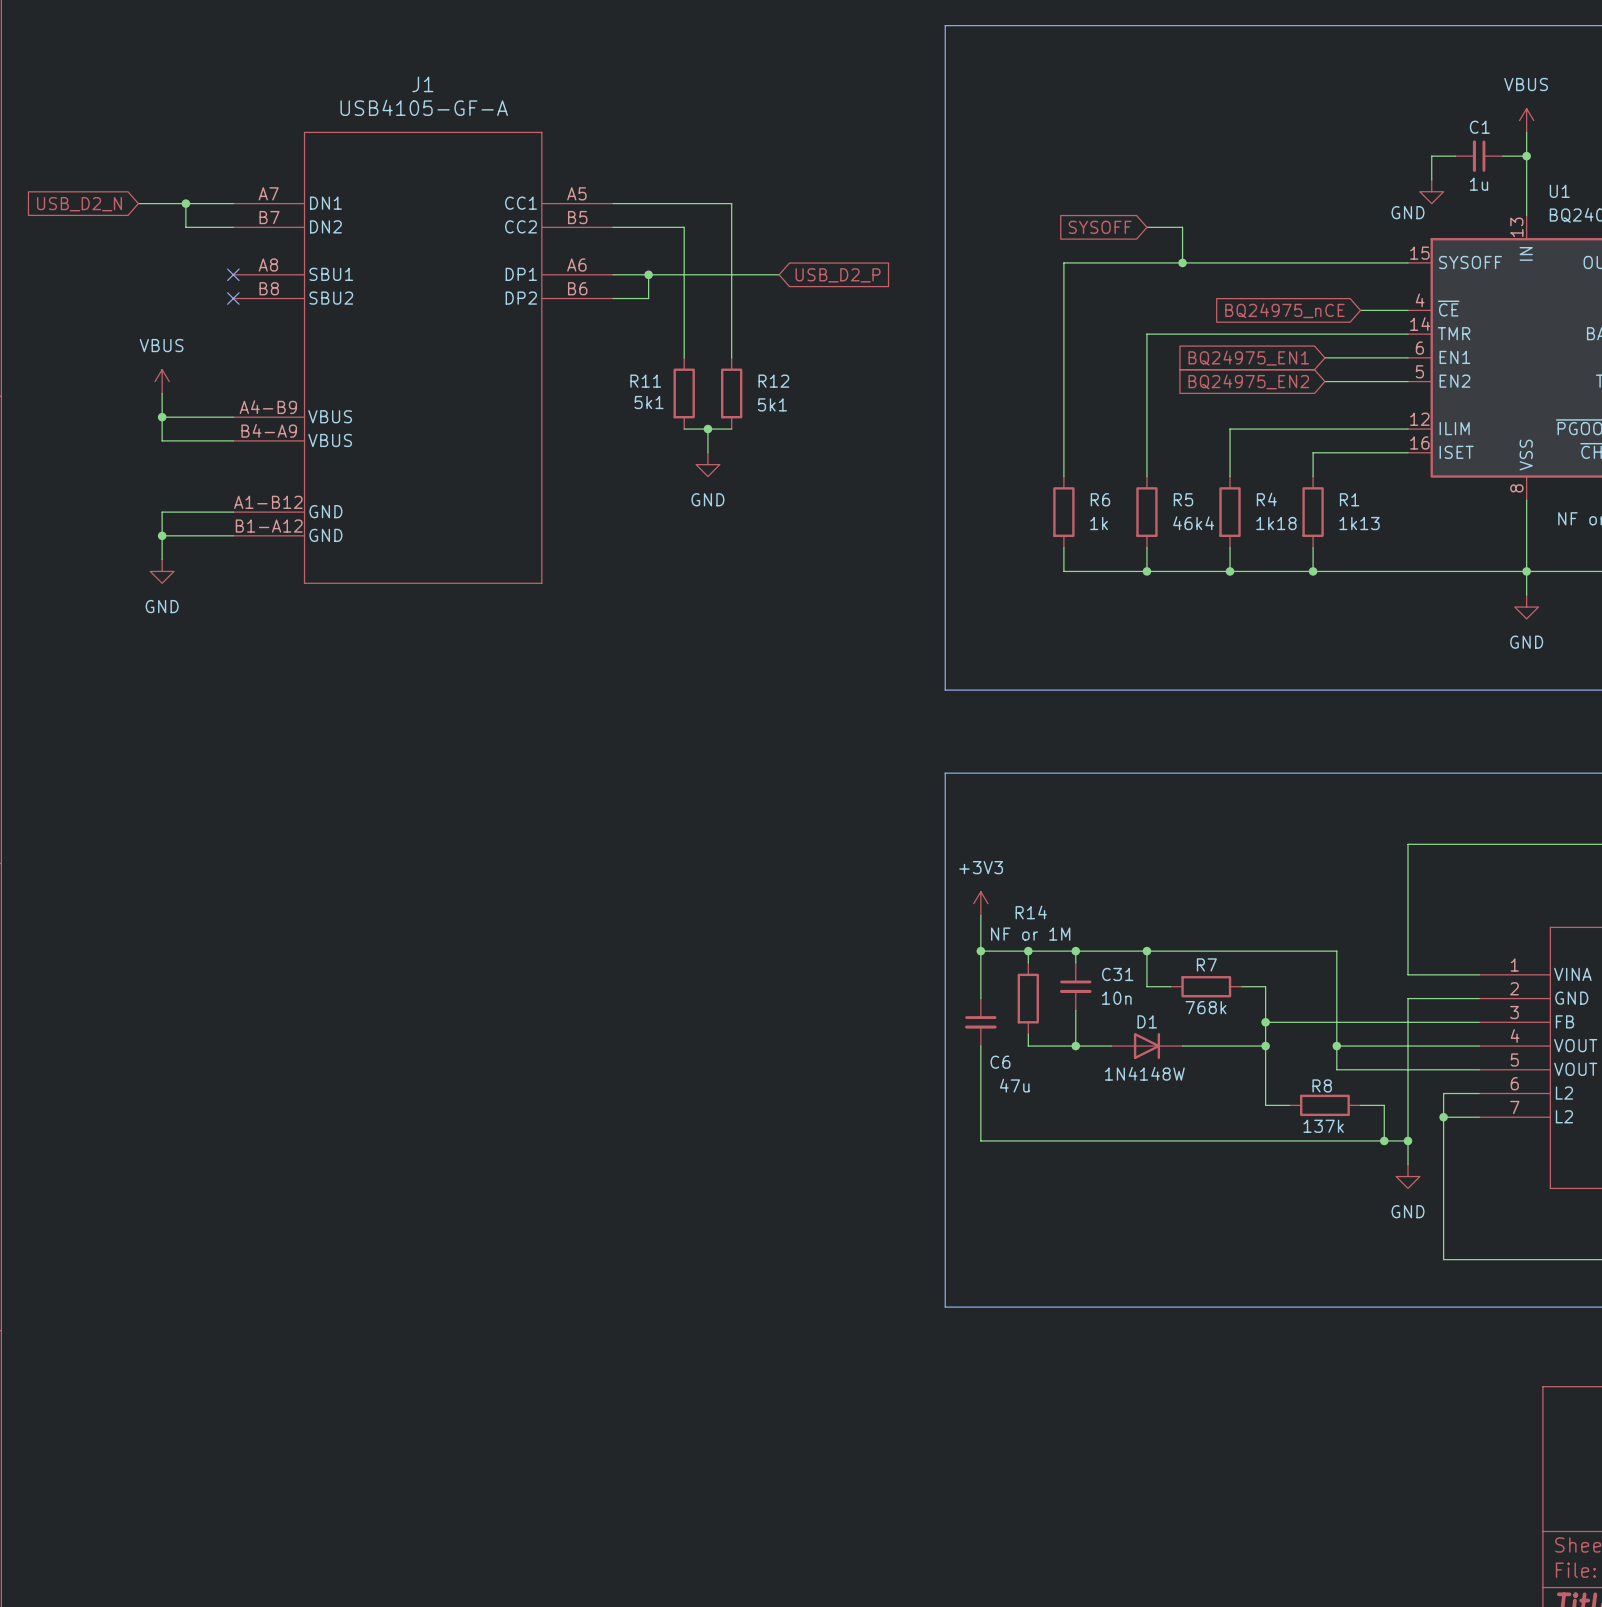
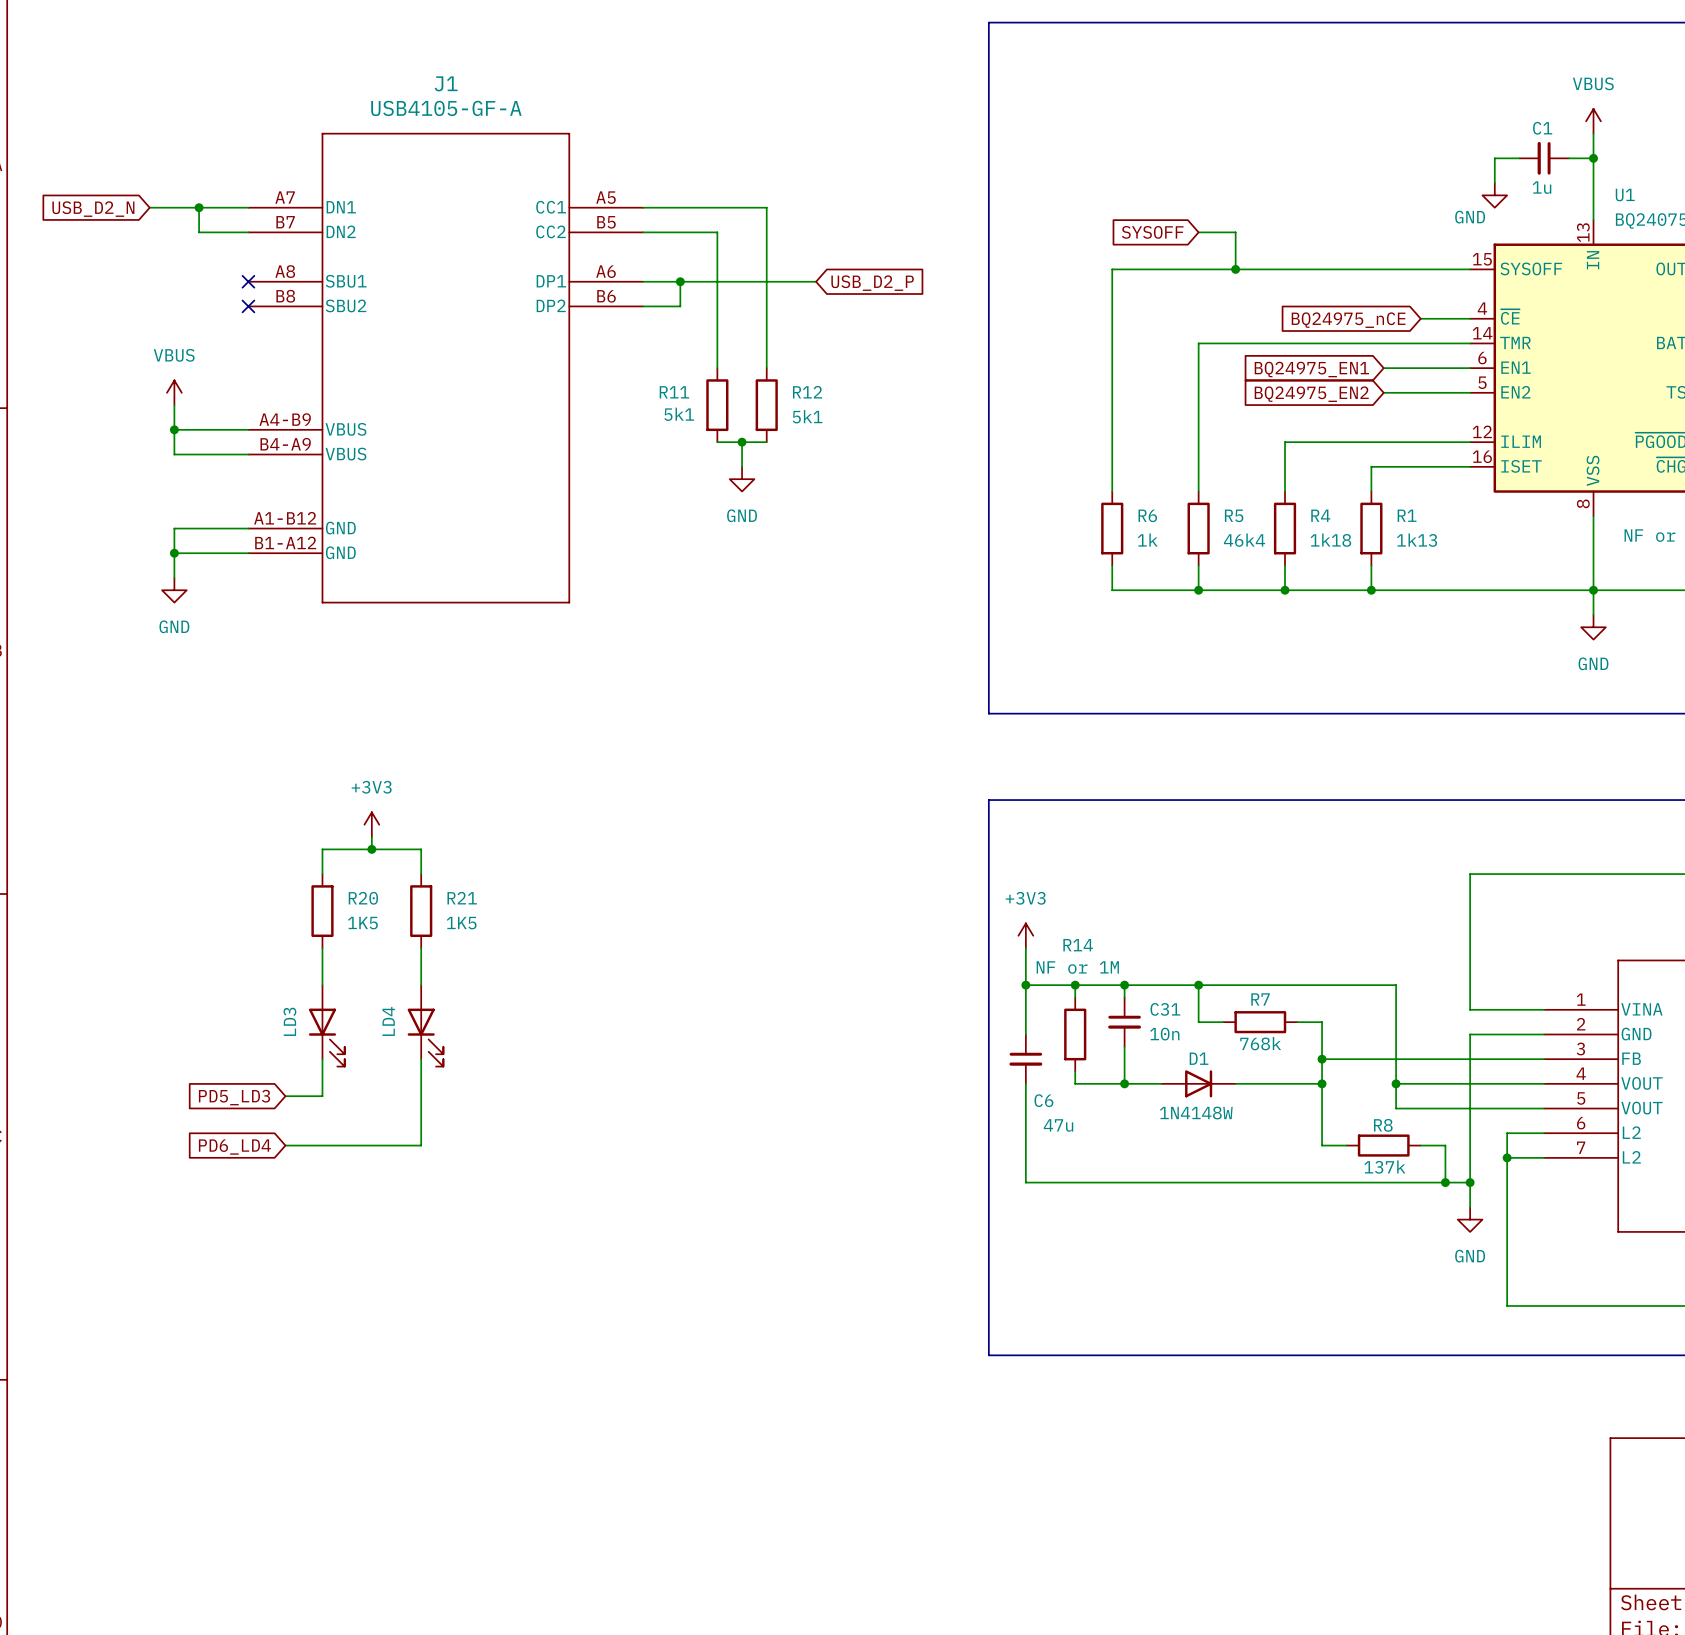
power symbol: none -> +3V3 (371, 824)
wire: none -> (371, 837) (371, 849)
junction: none -> (371, 849)
wire: none -> (322, 874) (322, 849) (421, 849) (421, 874)
R20: none -> 1K5 (322, 911)
R21: none -> 1K5 (421, 911)
wire: none -> (322, 948) (322, 985)
wire: none -> (421, 948) (421, 985)
LD3: none -> (326, 1025)
LD4: none -> (425, 1025)
wire: none -> (322, 1059) (322, 1096) (285, 1096)
wire: none -> (421, 1059) (421, 1145) (285, 1145)
global label: none -> PD5_LD3 (234, 1097)
global label: none -> PD6_LD4 (234, 1147)

